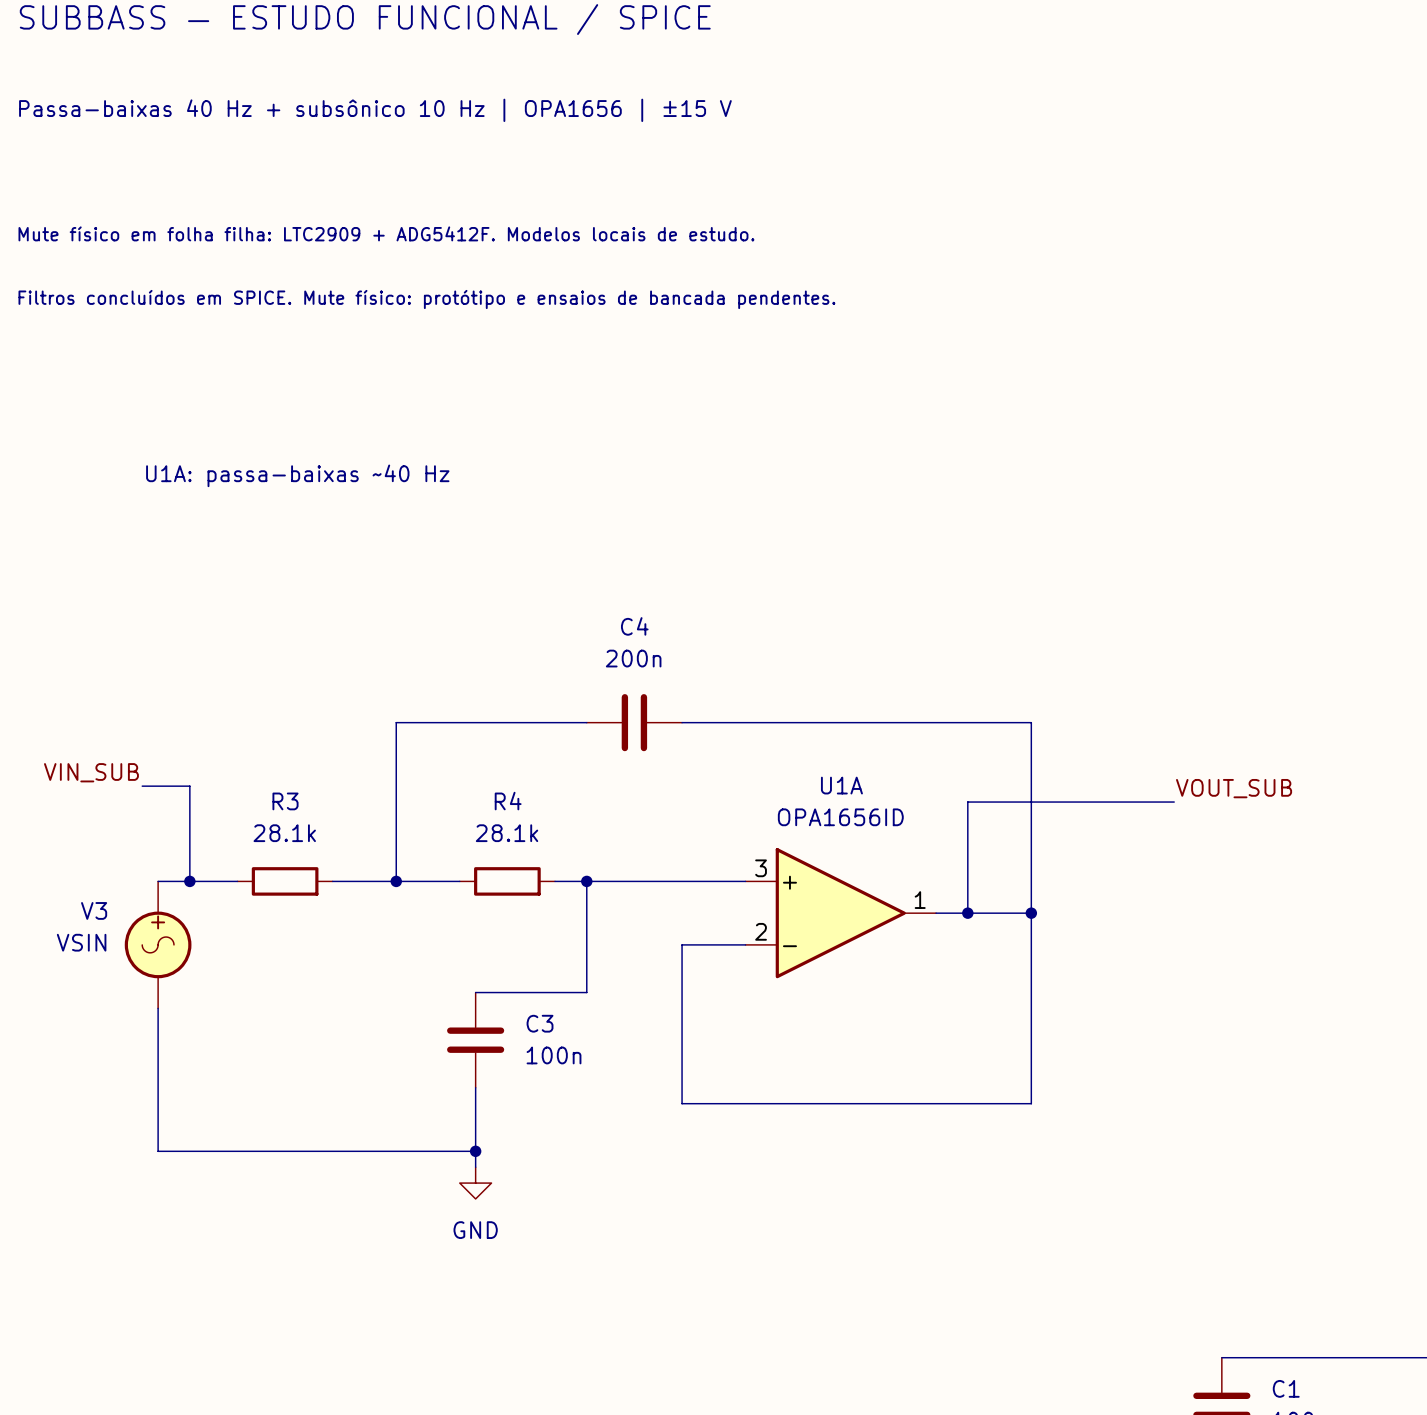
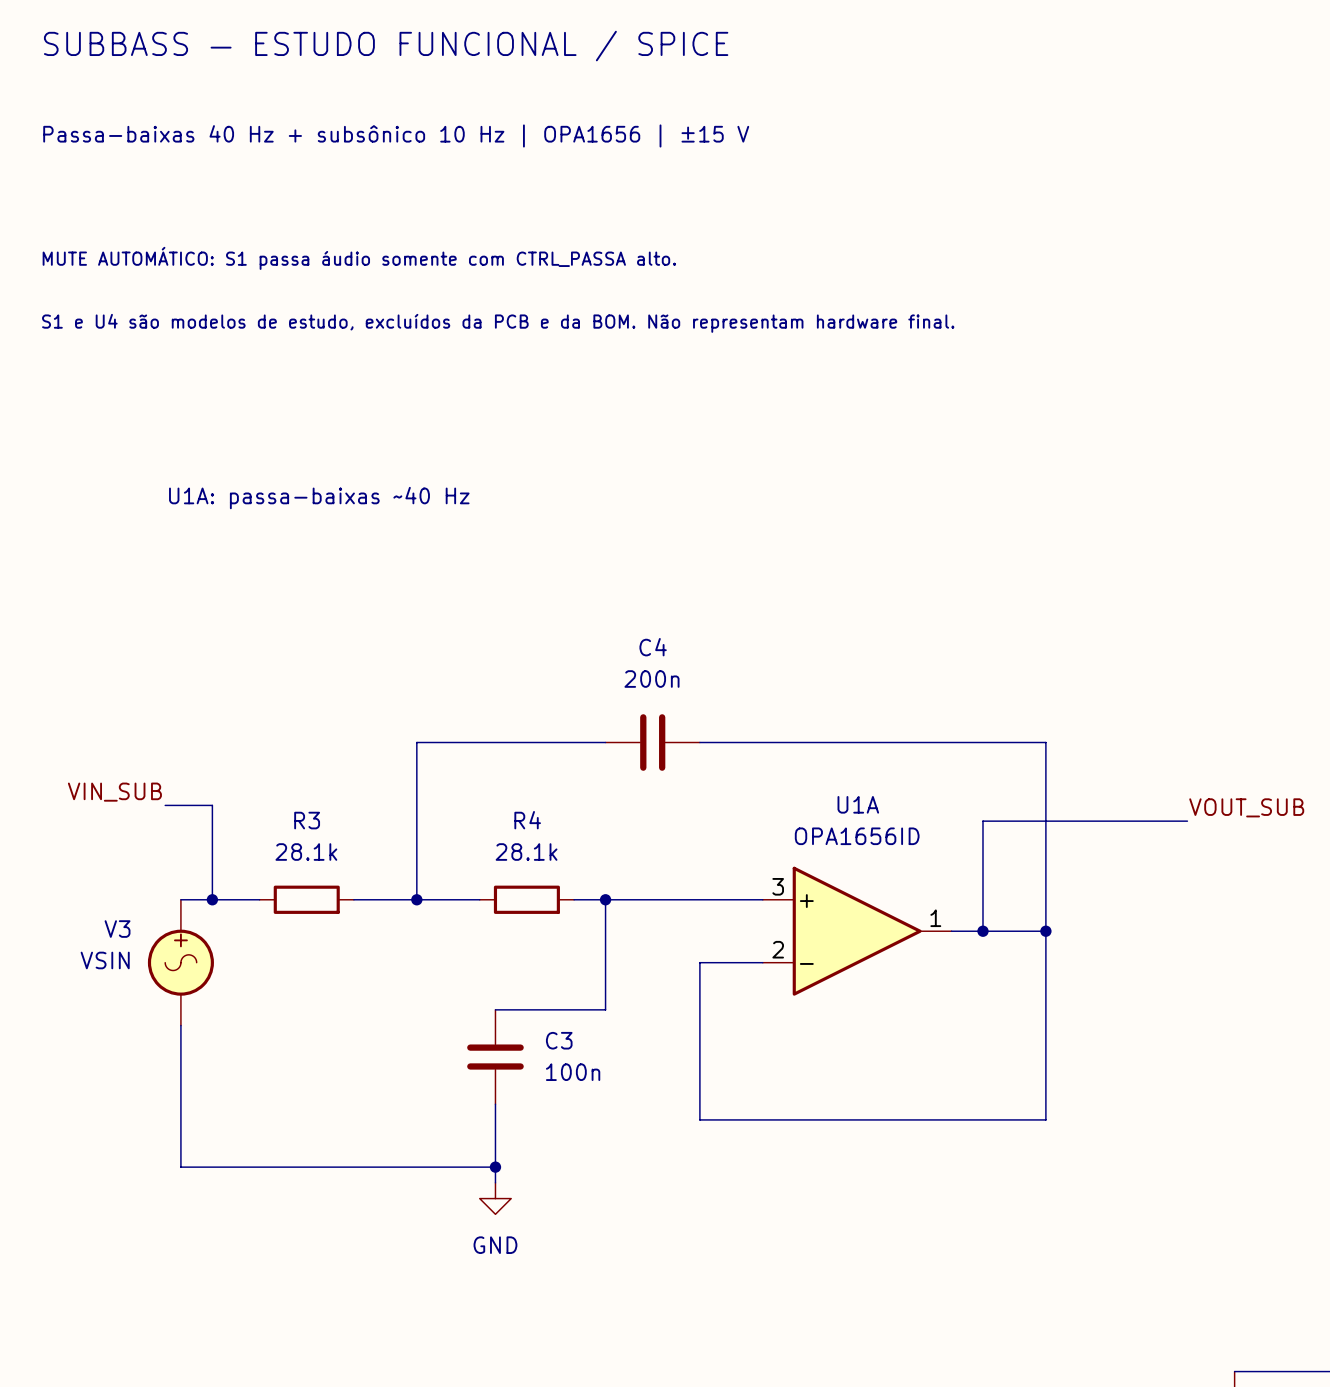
text: Mute físico em folha filha: LTC2909 + ADG5412F. Modelos locais de estudo. (386, 233) -> MUTE AUTOMÁTICO: S1 passa áudio somente com CTRL_PASSA alto. (359, 258)
text: Filtros concluídos em SPICE. Mute físico: protótipo e ensaios de bancada pendentes. (426, 299) -> S1 e U4 são modelos de estudo, excluídos da PCB e da BOM. Não representam hardware final. (498, 323)

